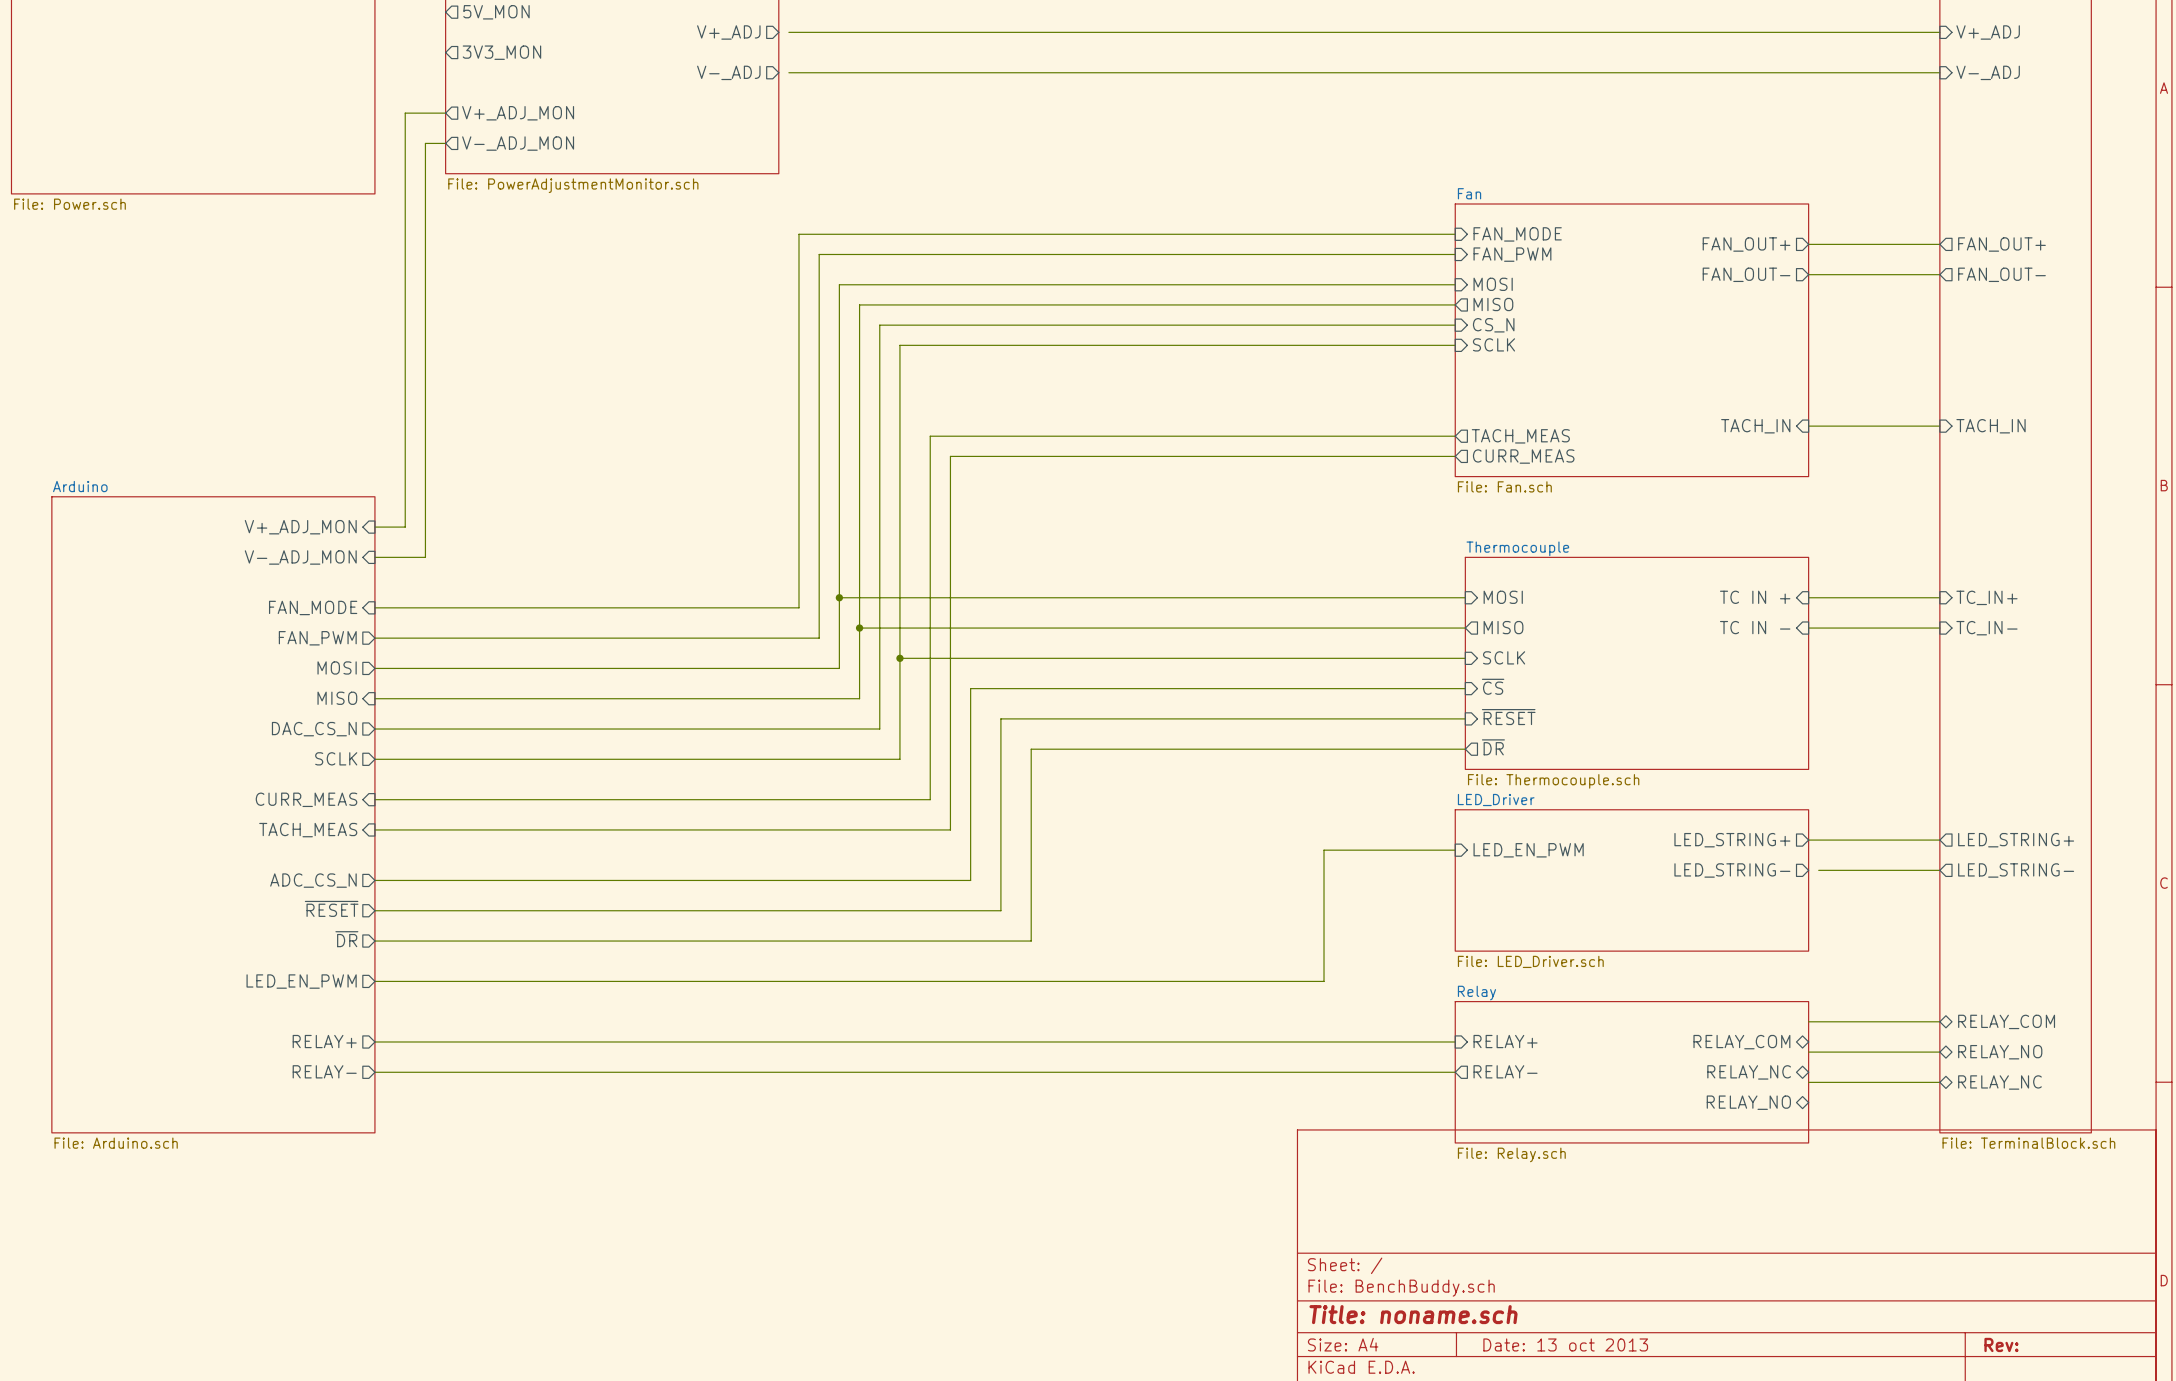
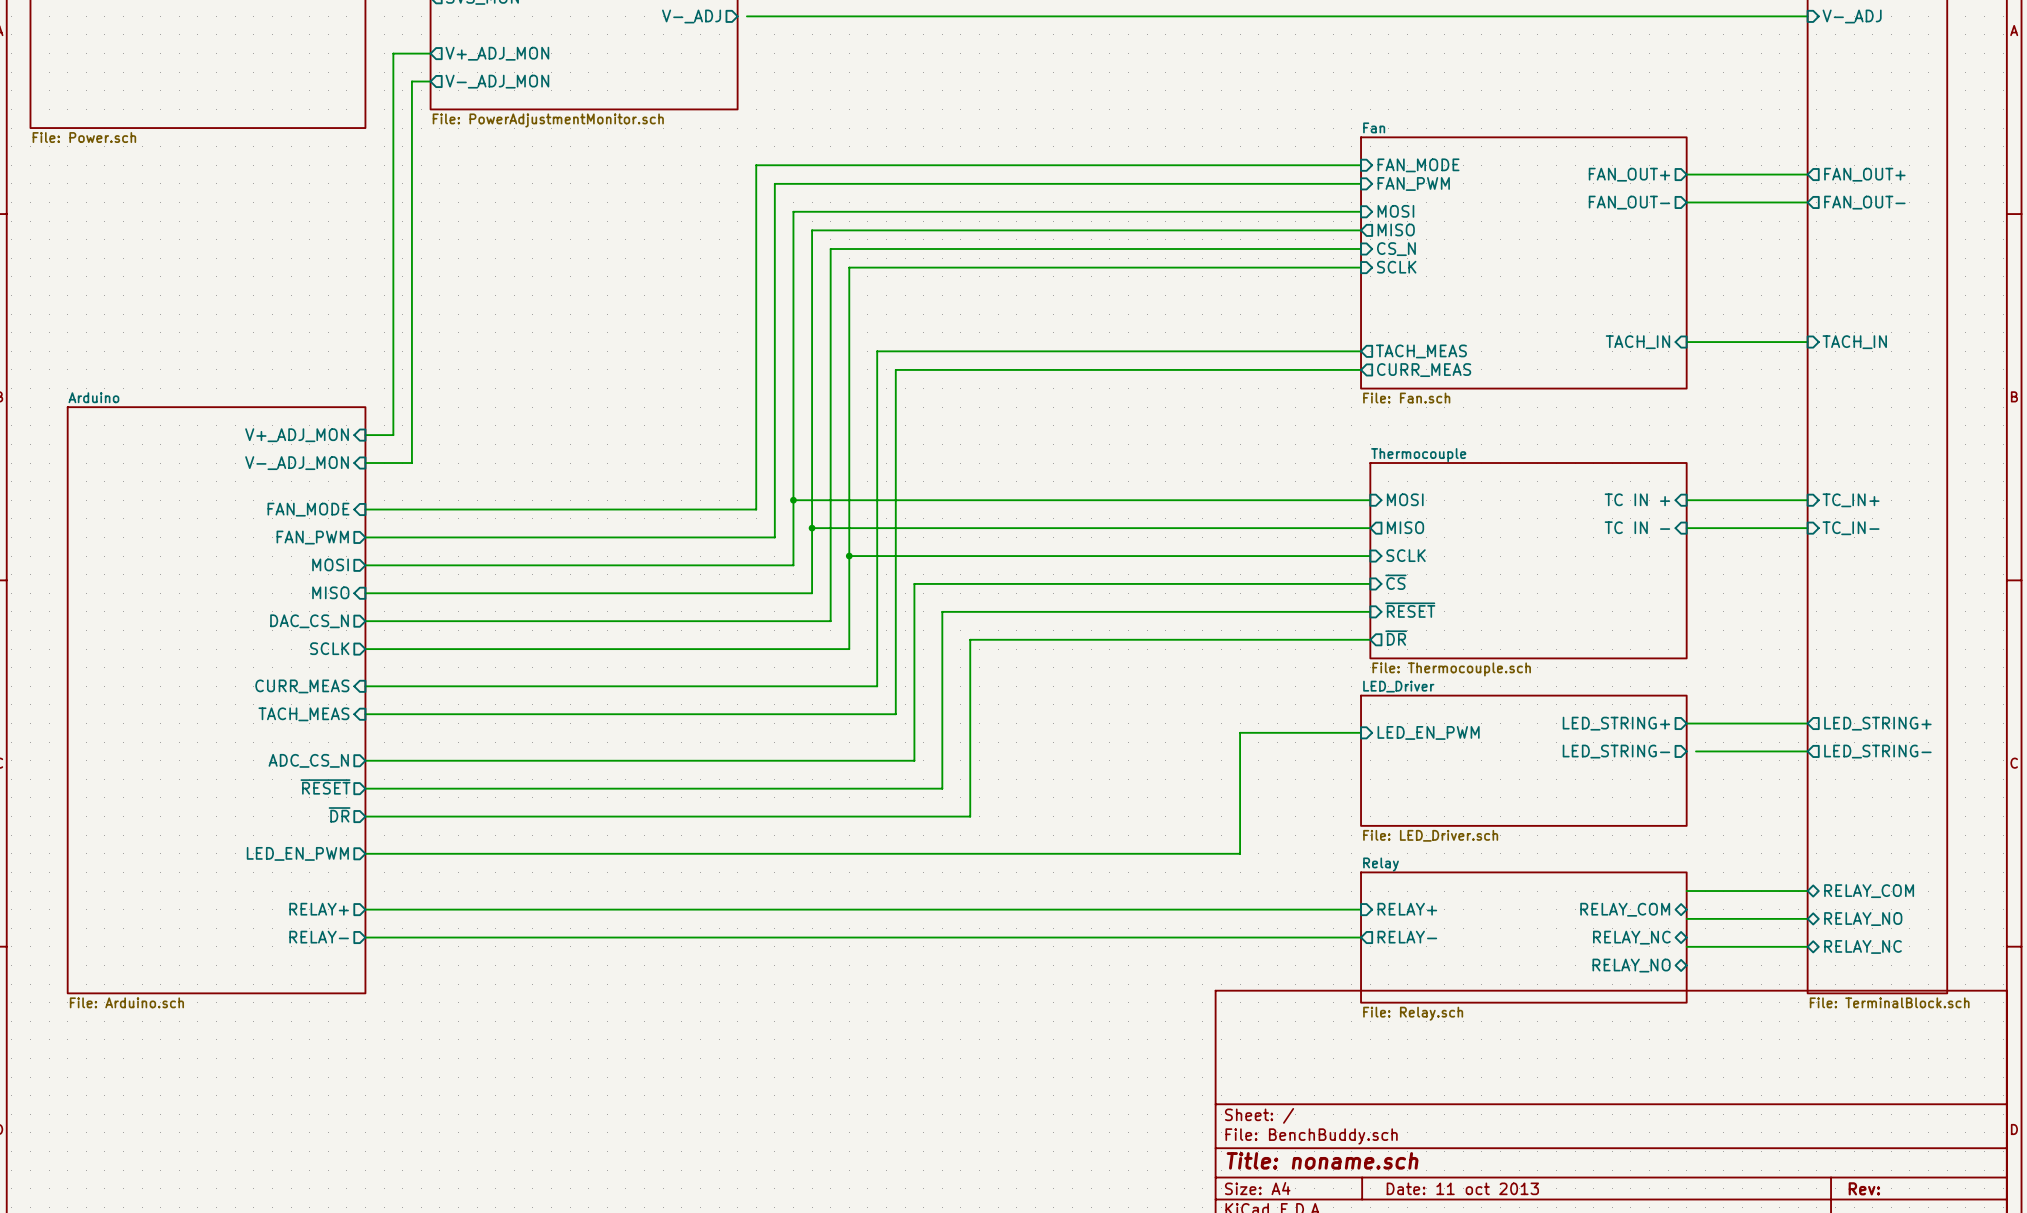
title block: Date: 13 oct 2013 (1565, 1344) -> Date: 11 oct 2013 (1462, 1188)

